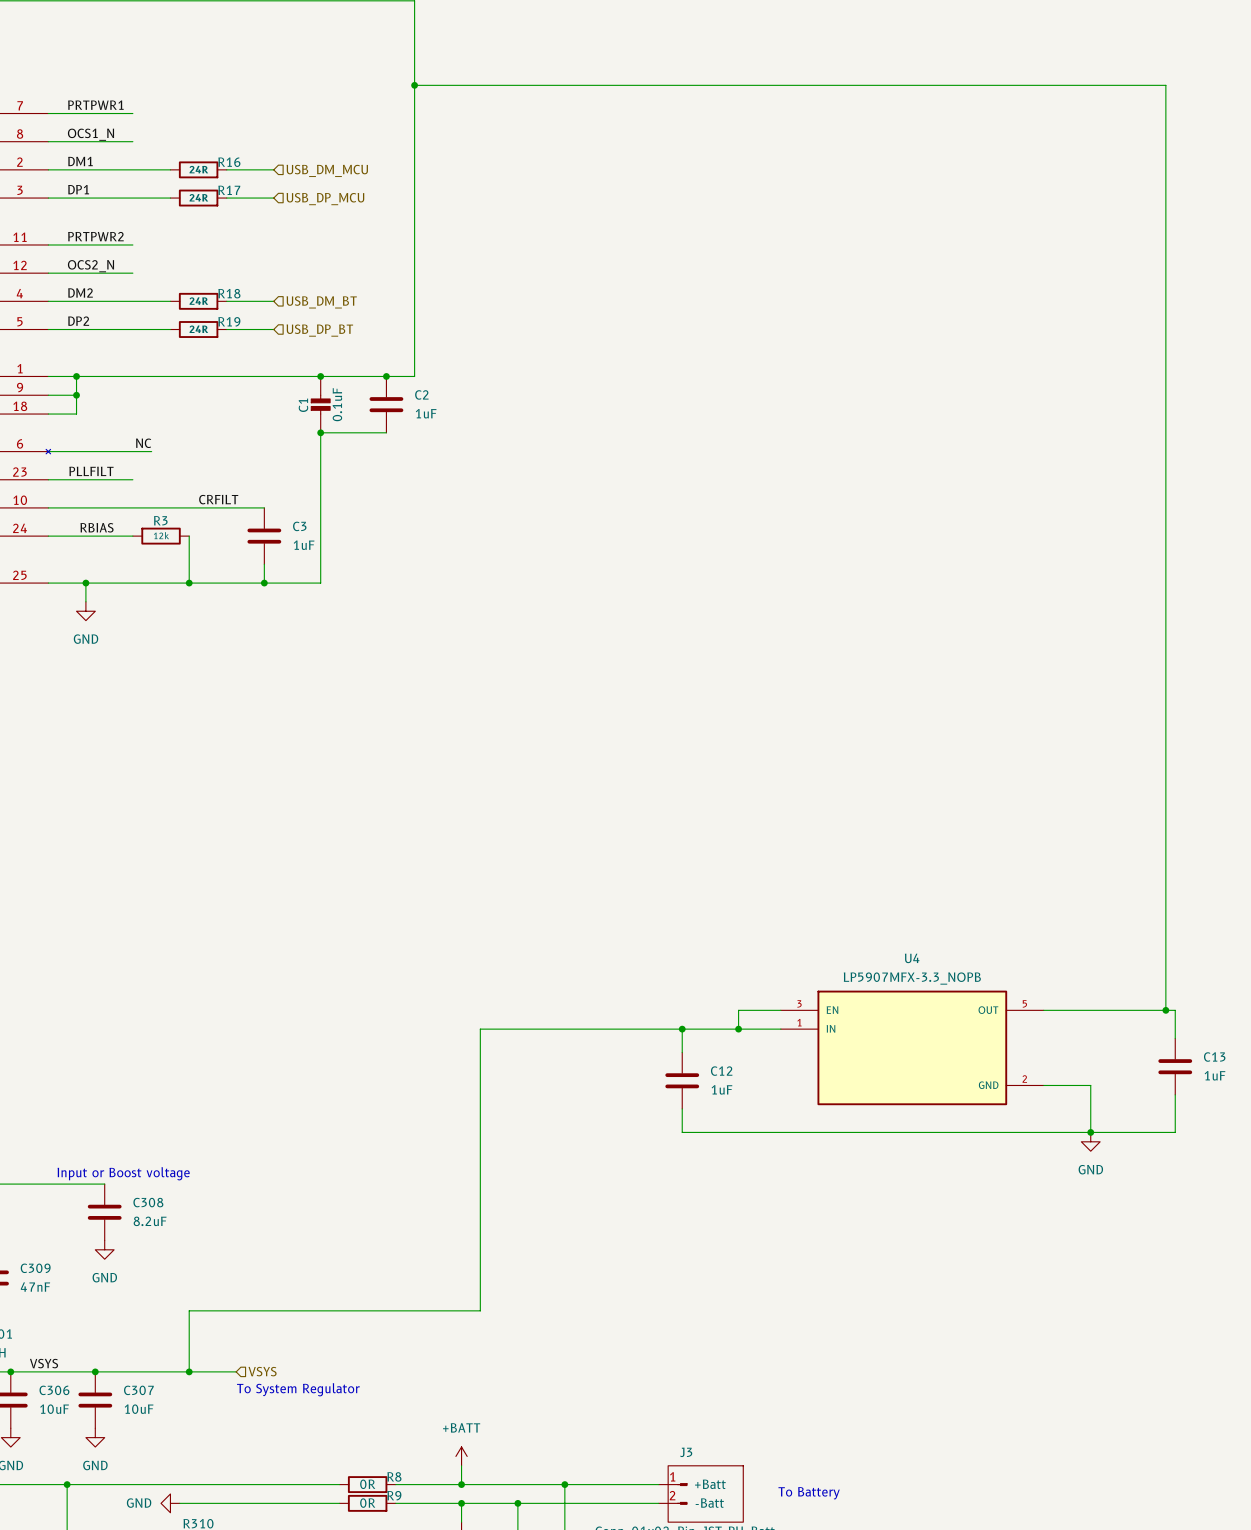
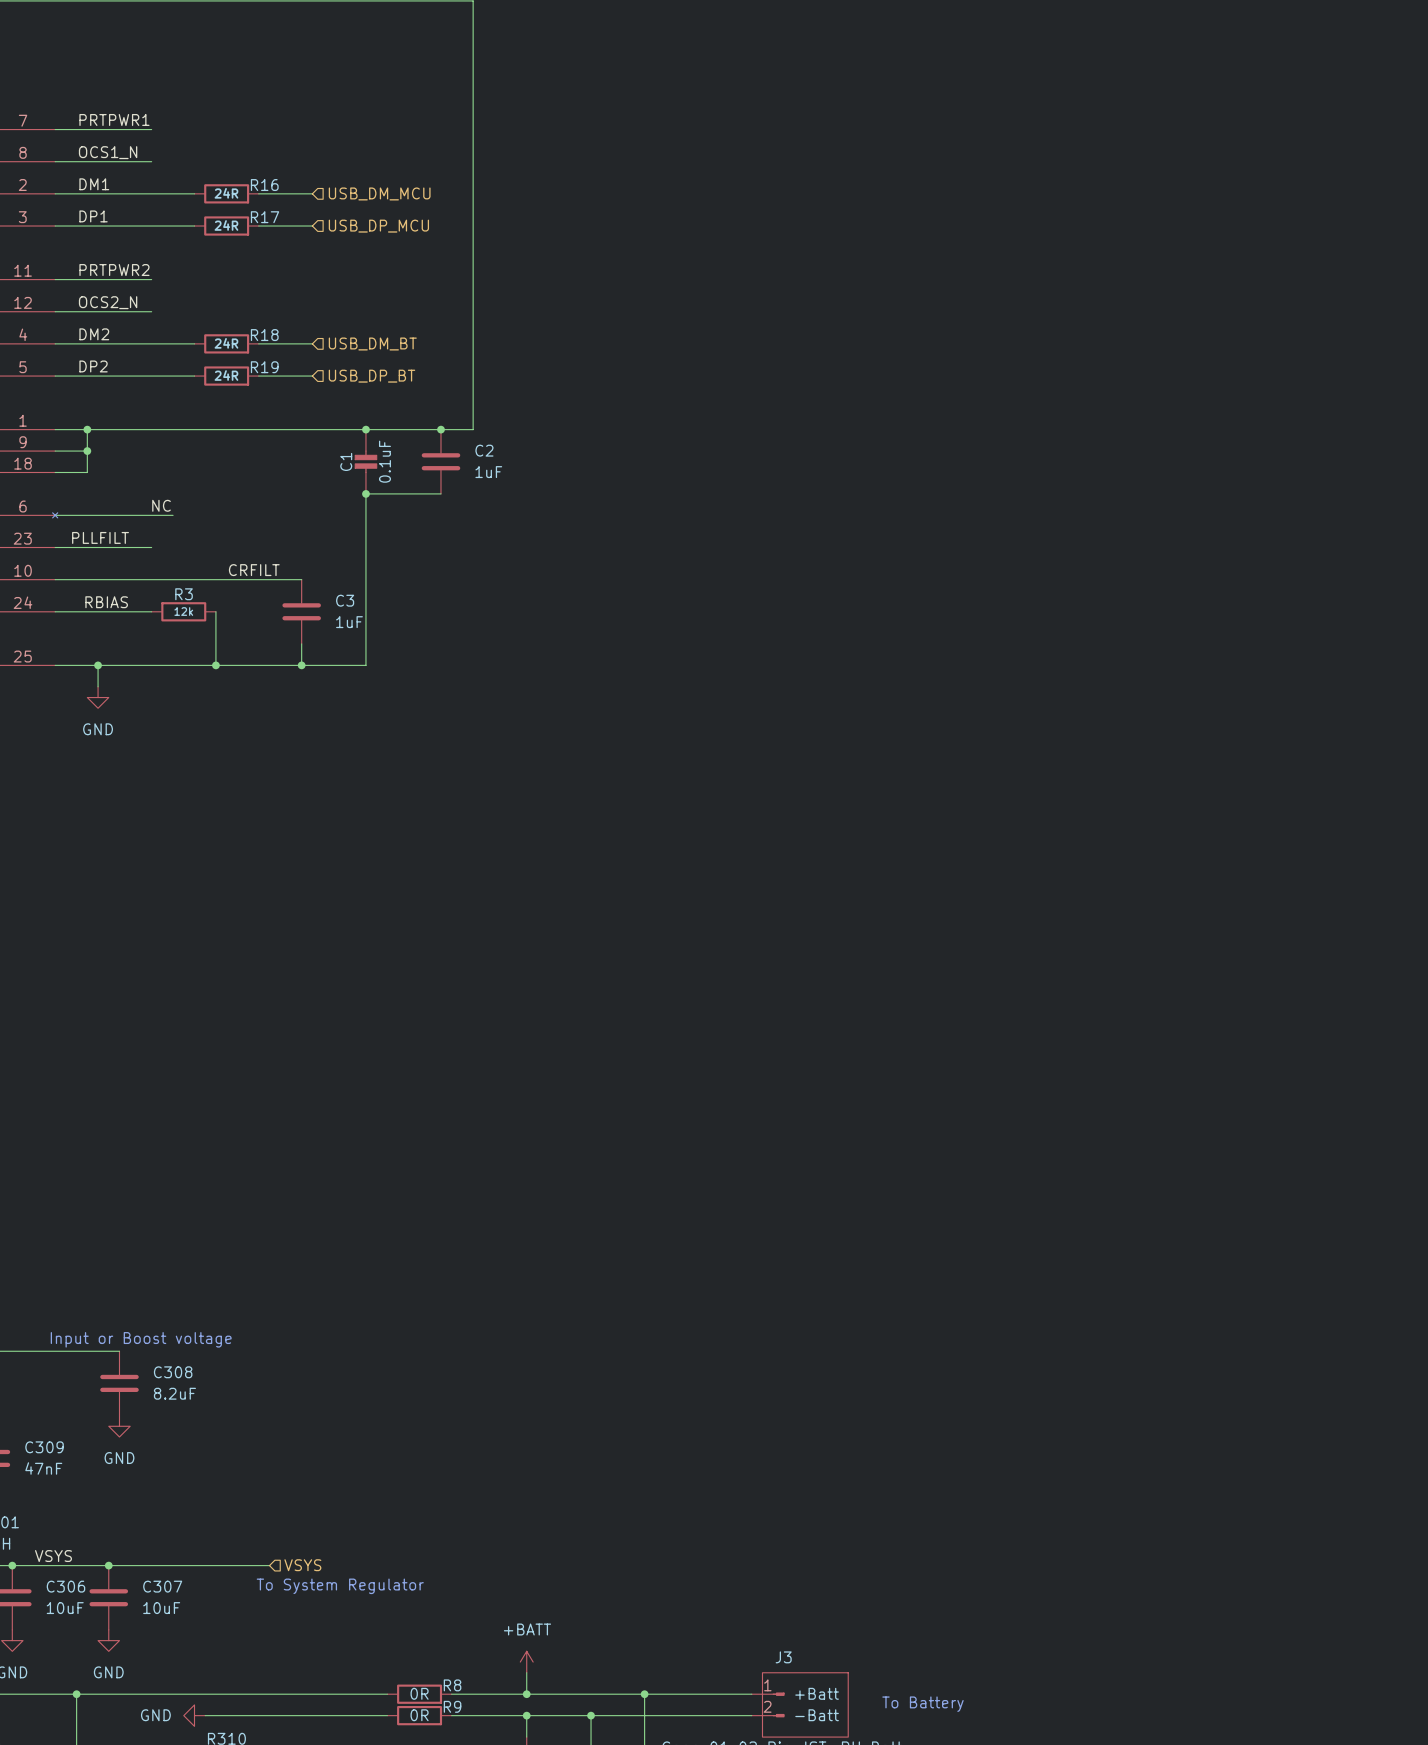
wire: (414, 85) (1165, 85) (1165, 1010) -> none
junction: (414, 85) -> none
wire: (780, 1010) (738, 1010) (738, 1029) -> none
wire: (1043, 1010) (1175, 1010) (1175, 1038) -> none
junction: (1165, 1010) -> none
wire: (682, 1029) (682, 1052) -> none
junction: (682, 1029) -> none
junction: (738, 1029) -> none
wire: (780, 1029) (480, 1029) (480, 1310) (189, 1310) (189, 1371) -> none
U4: LP5907MFX-3.3_NOPB (912, 1047) -> none
C13: 1uF (1175, 1066) -> none
C12: 1uF (682, 1080) -> none
wire: (1043, 1085) (1090, 1085) (1090, 1132) -> none
wire: (1175, 1094) (1175, 1132) (682, 1132) (682, 1108) -> none
junction: (1090, 1132) -> none
power symbol: GND (1090, 1141) -> none
junction: (189, 1371) -> none

